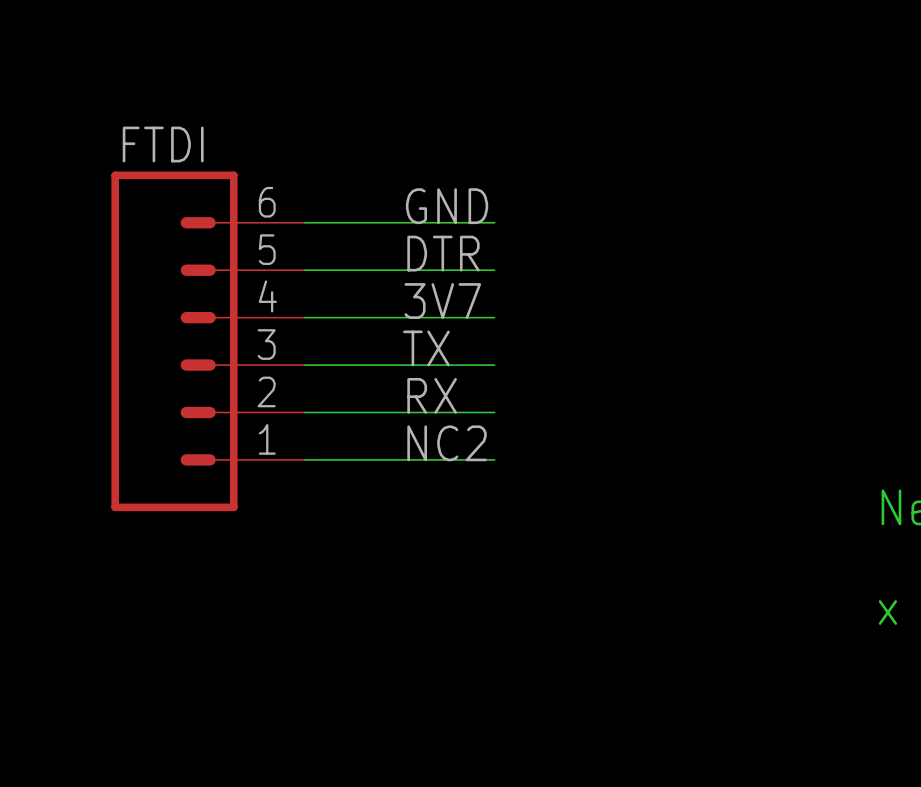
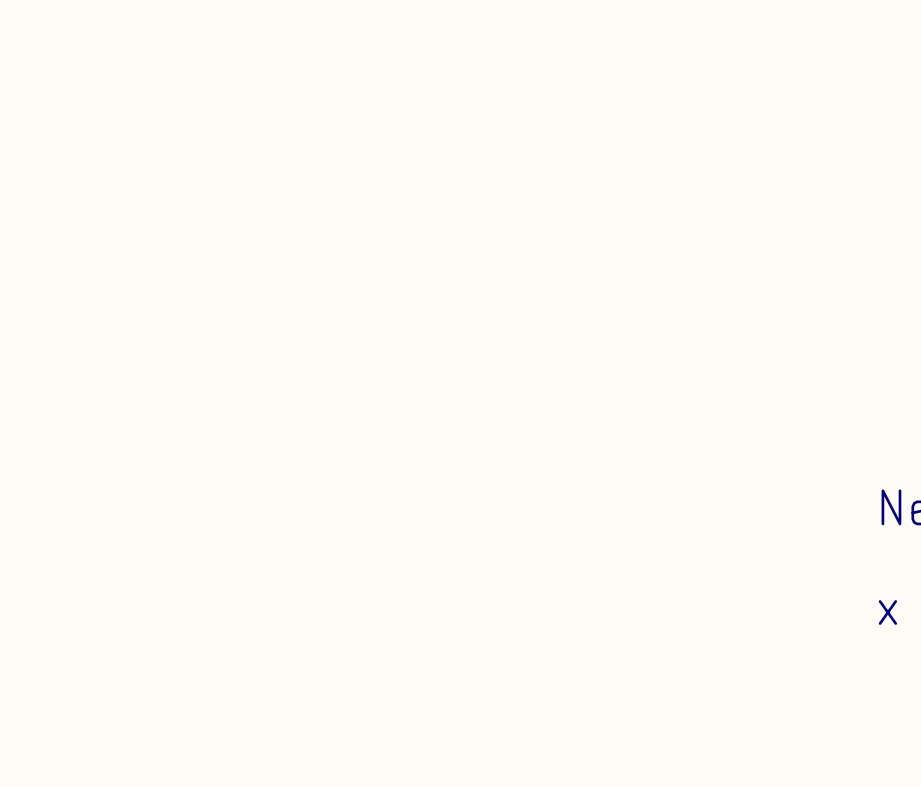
label: GND (447, 206) -> none
wire: (304, 222) (494, 222) -> none
label: DTR (443, 253) -> none
wire: (304, 270) (494, 270) -> none
label: 3V7 (442, 301) -> none
wire: (304, 317) (494, 317) -> none
FTDI: (208, 341) -> none
label: TX (426, 348) -> none
wire: (304, 365) (494, 365) -> none
label: RX (432, 395) -> none
wire: (304, 412) (494, 412) -> none
label: NC2 (447, 443) -> none
wire: (304, 459) (494, 459) -> none

